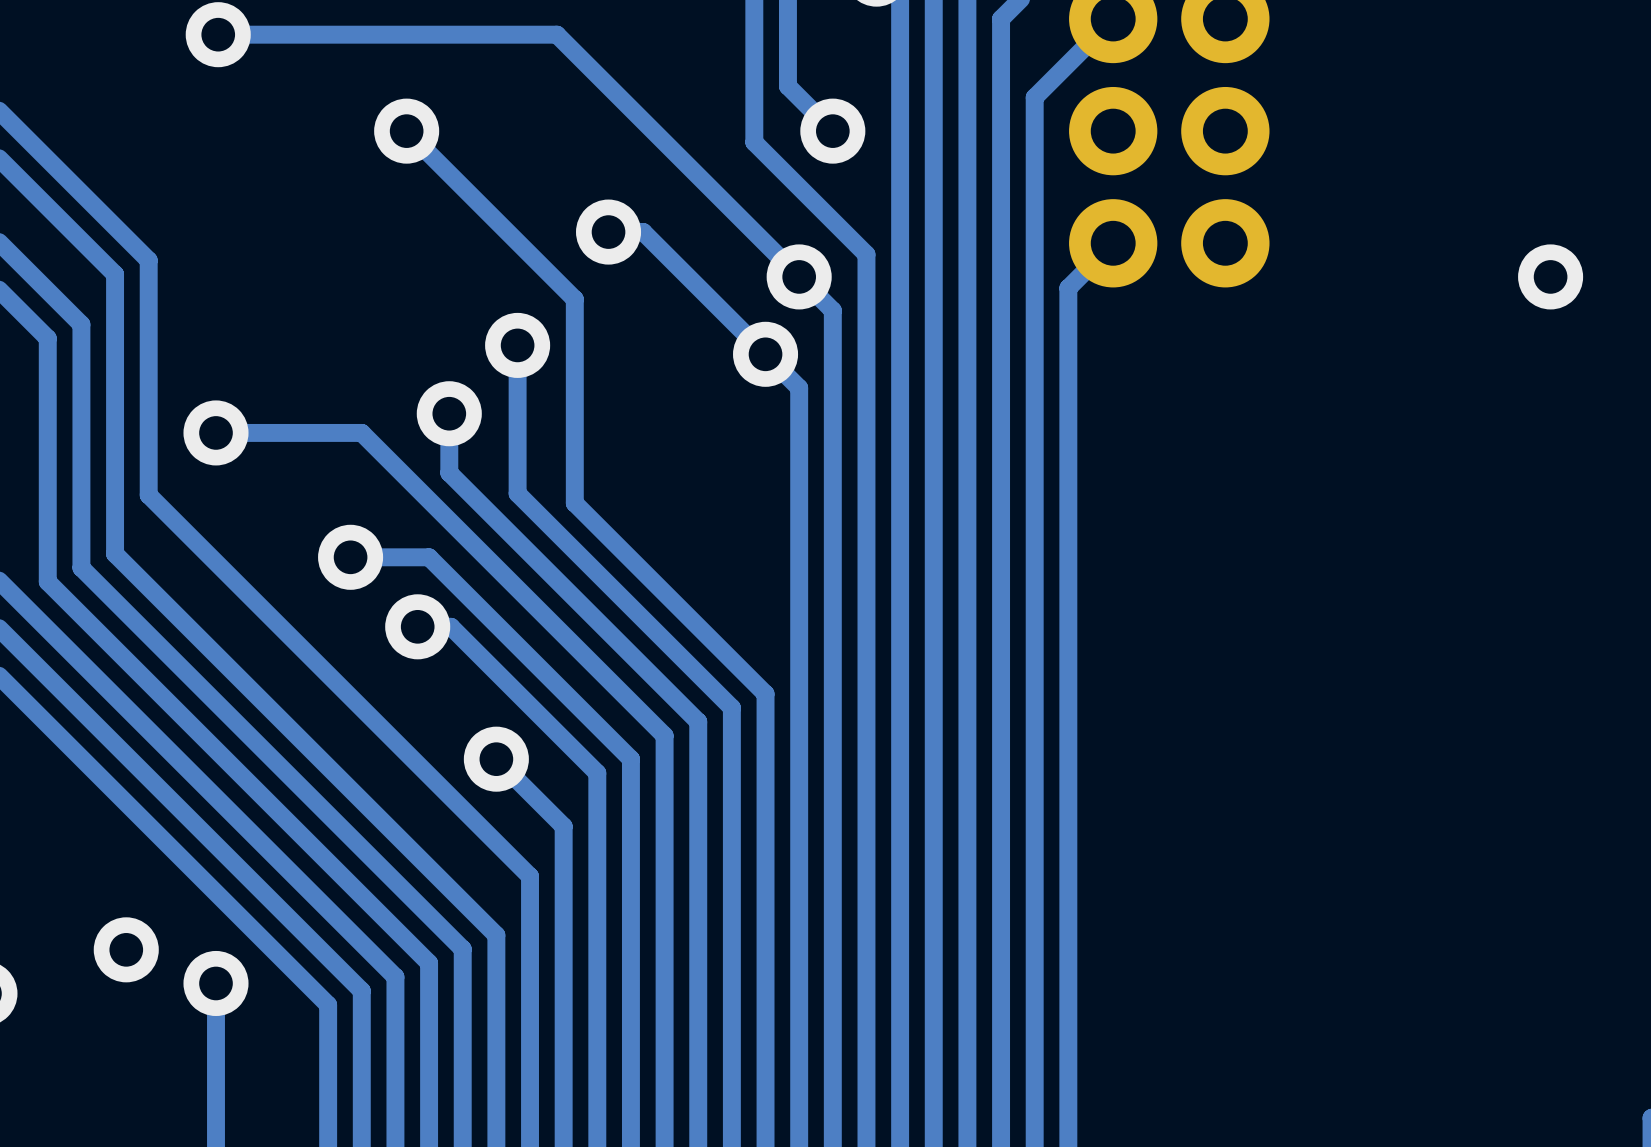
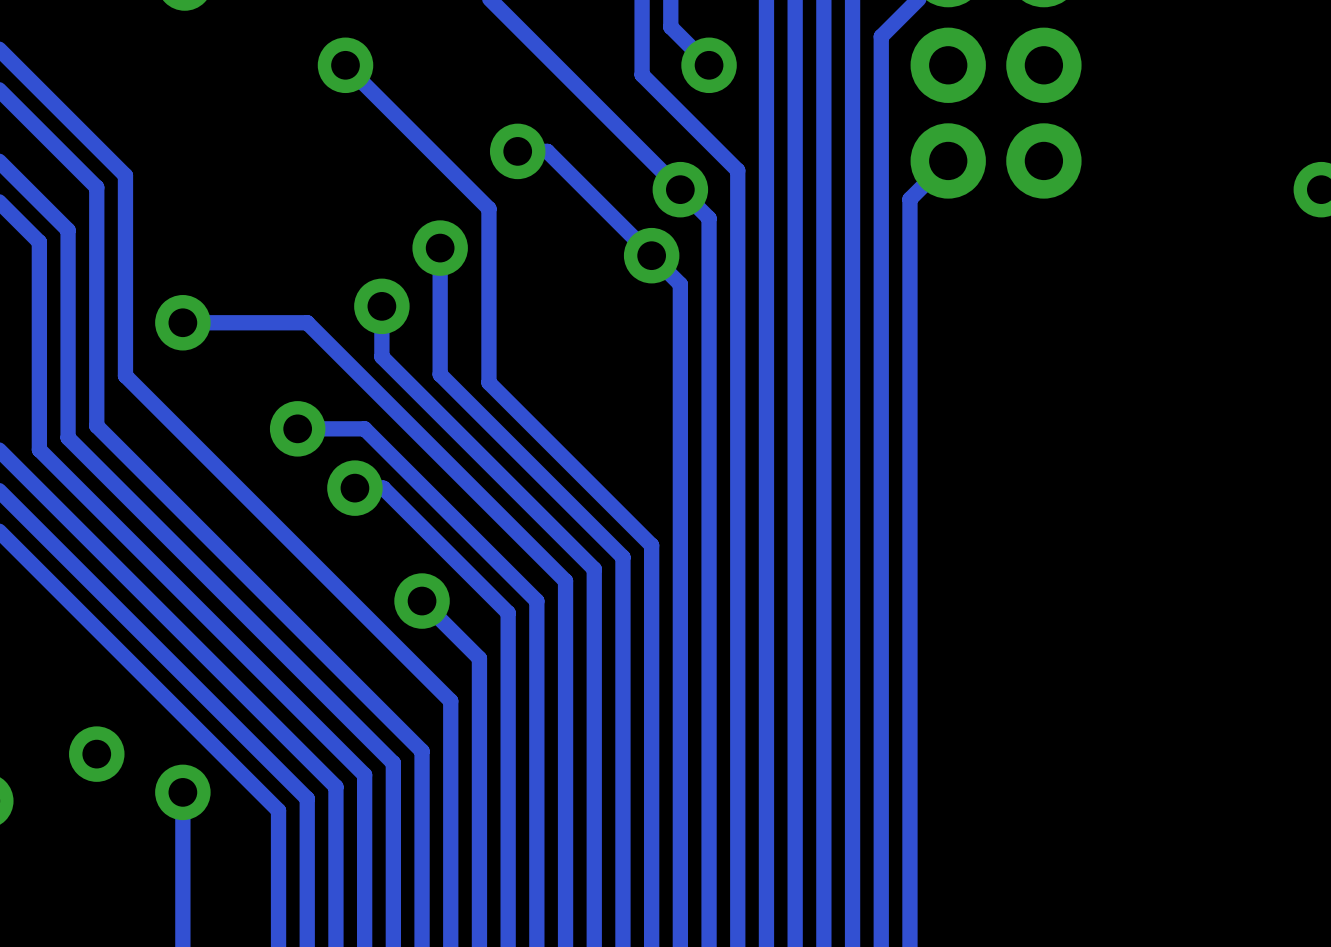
via position: (126, 949) -> (96, 754)

